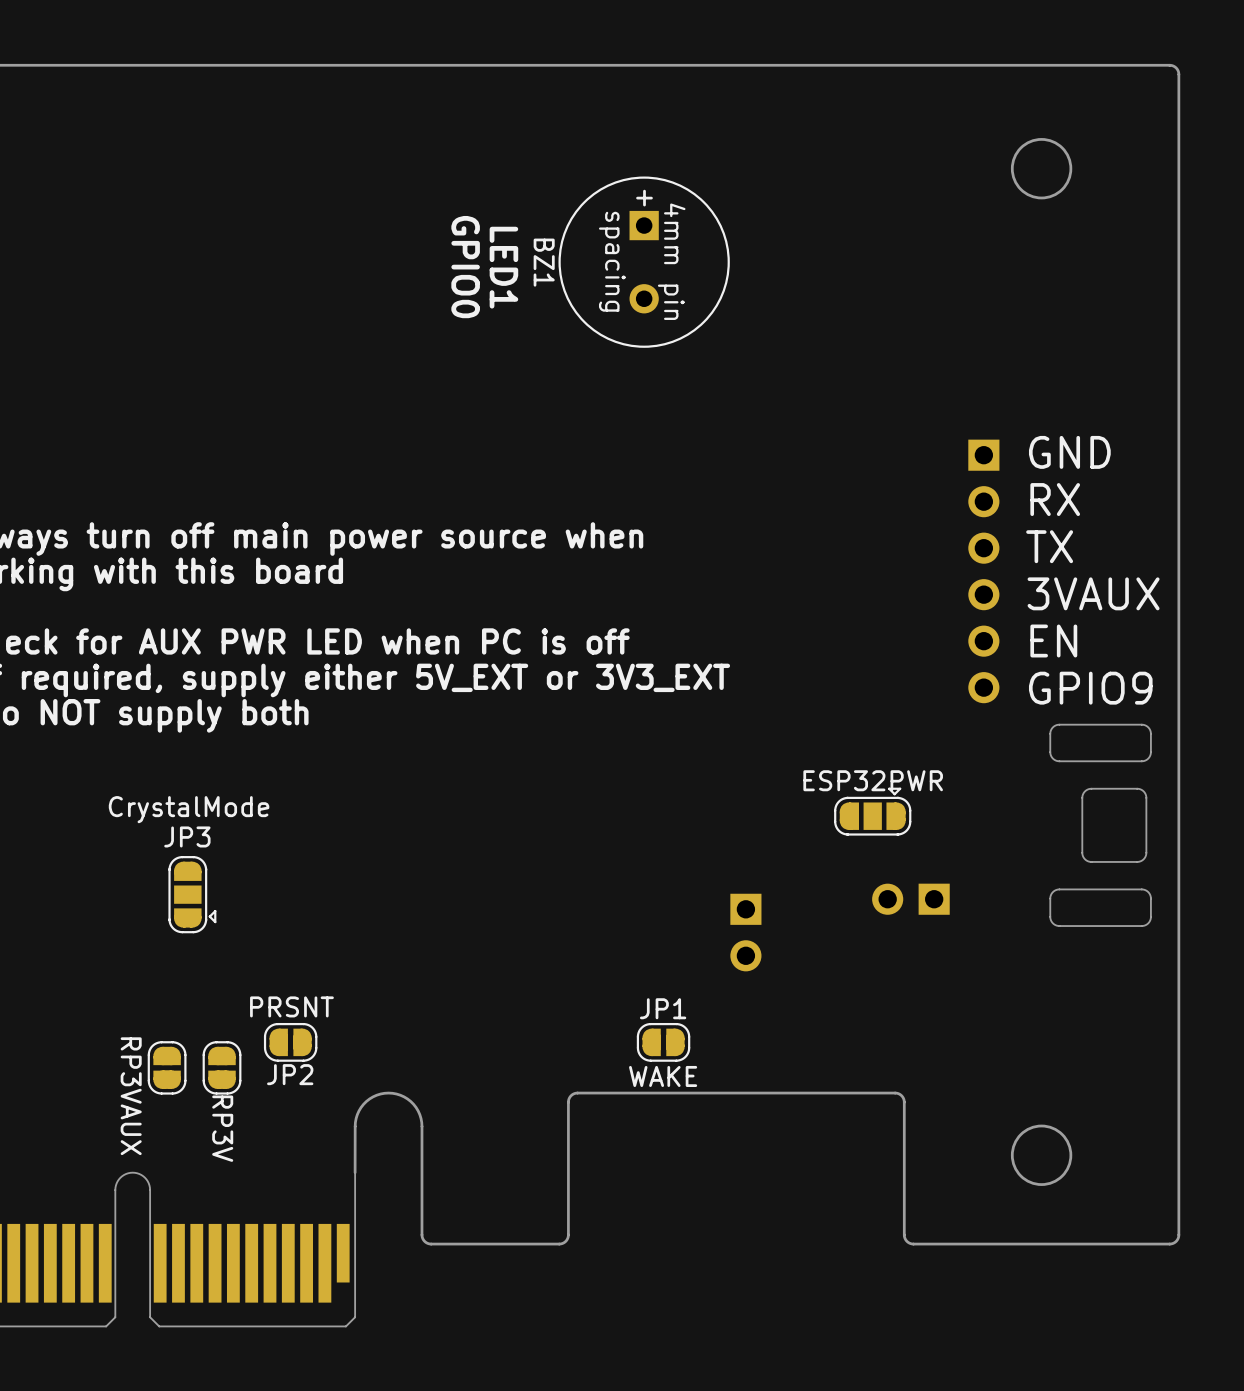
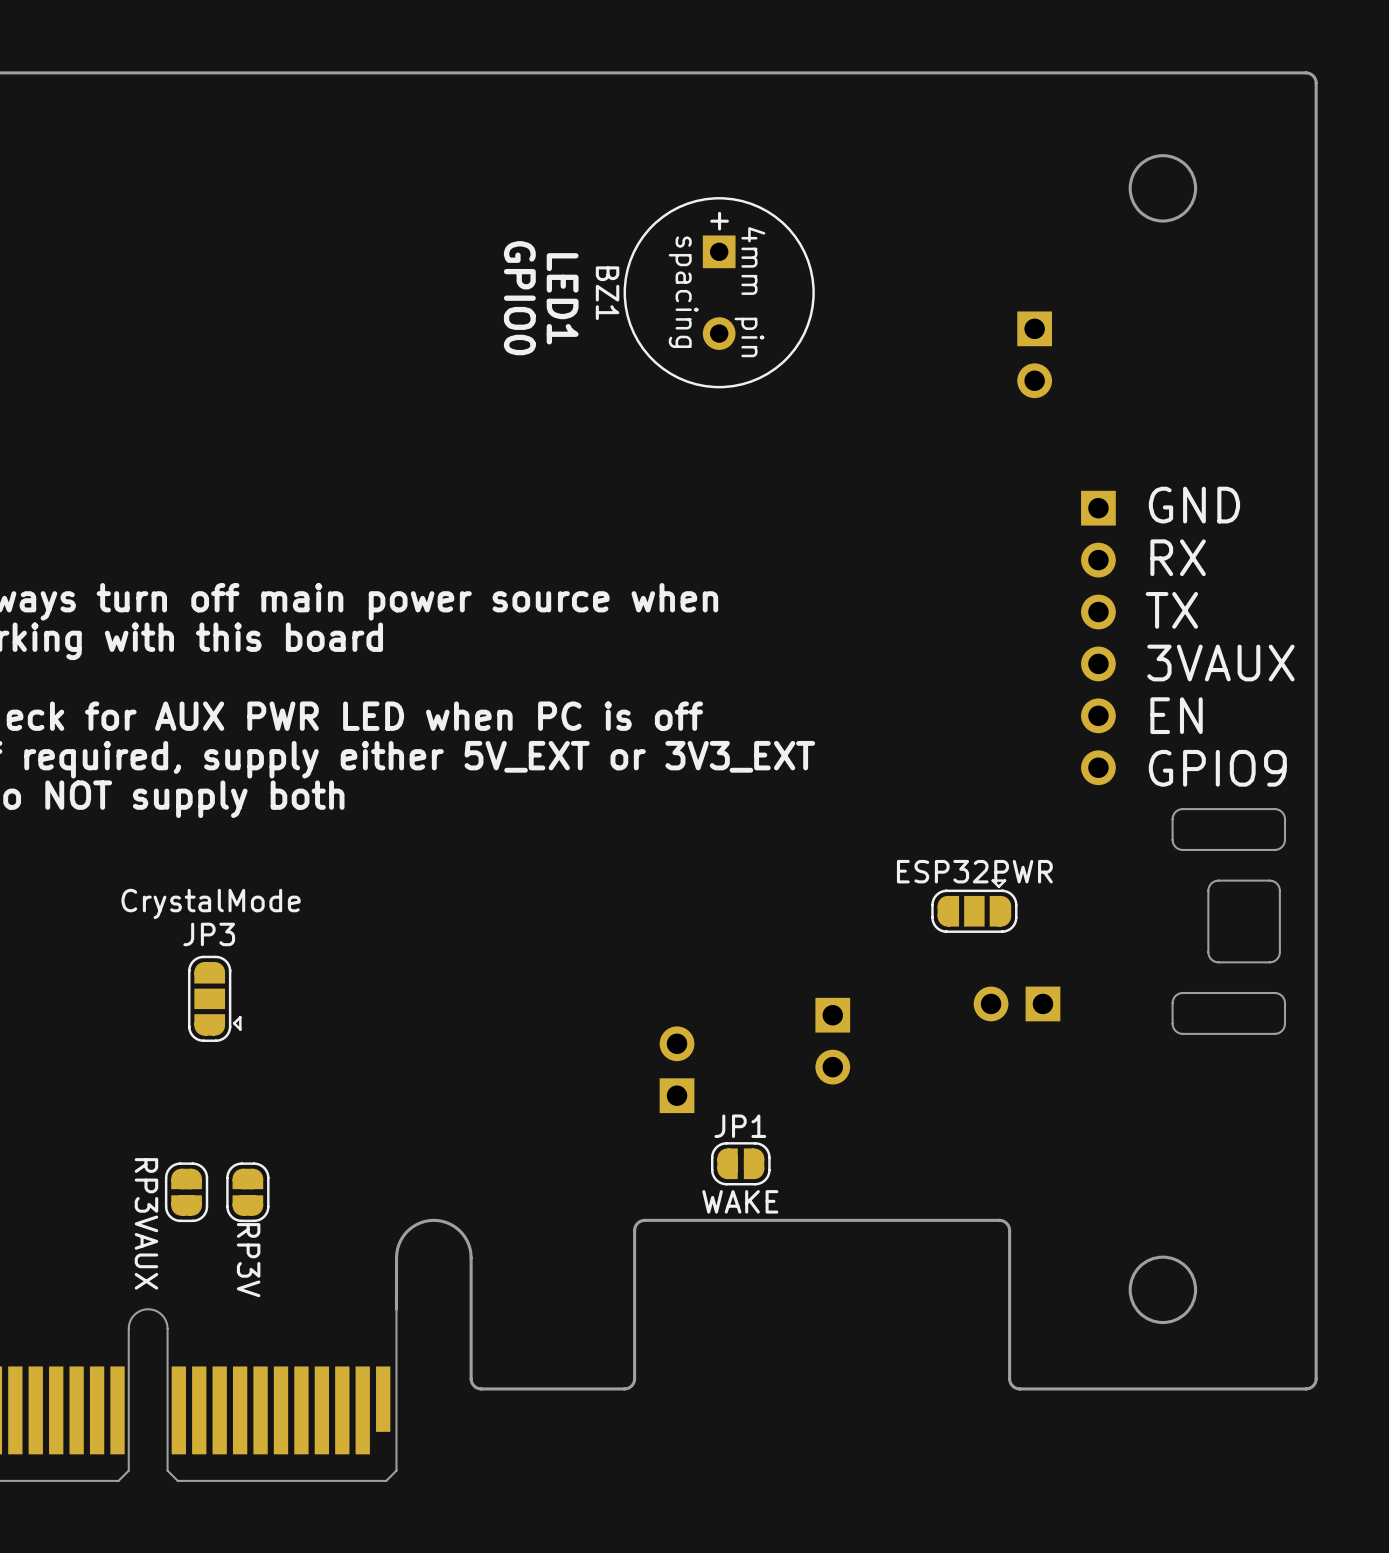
part: none -> (1034, 354)
part: none -> (677, 1069)
JP2: PRSNT (290, 1042) -> none

